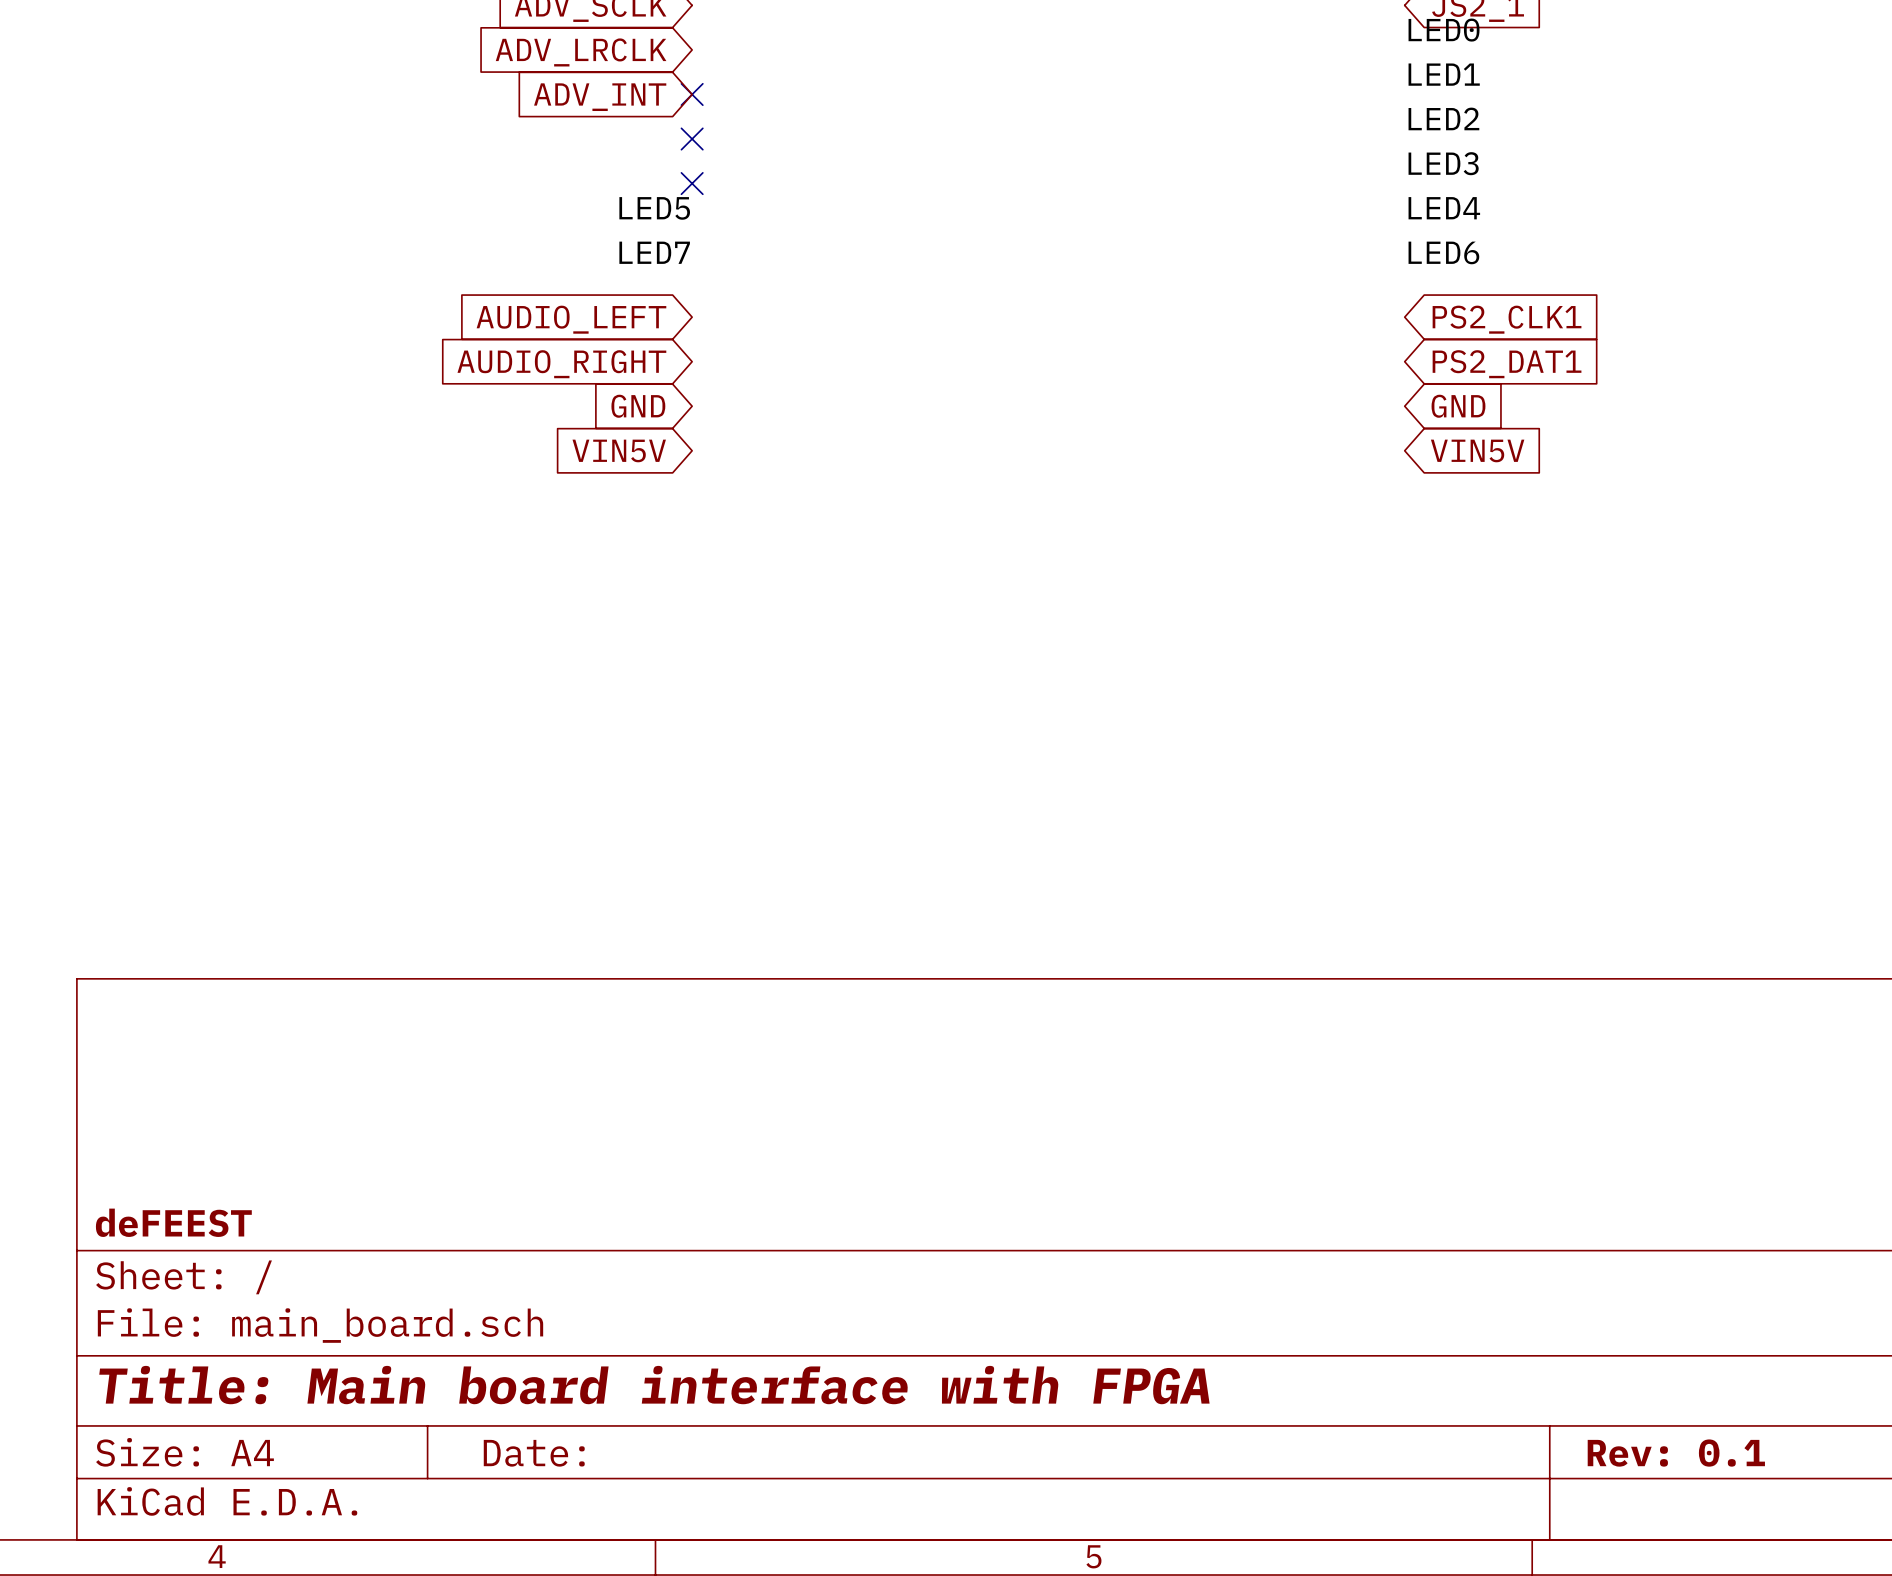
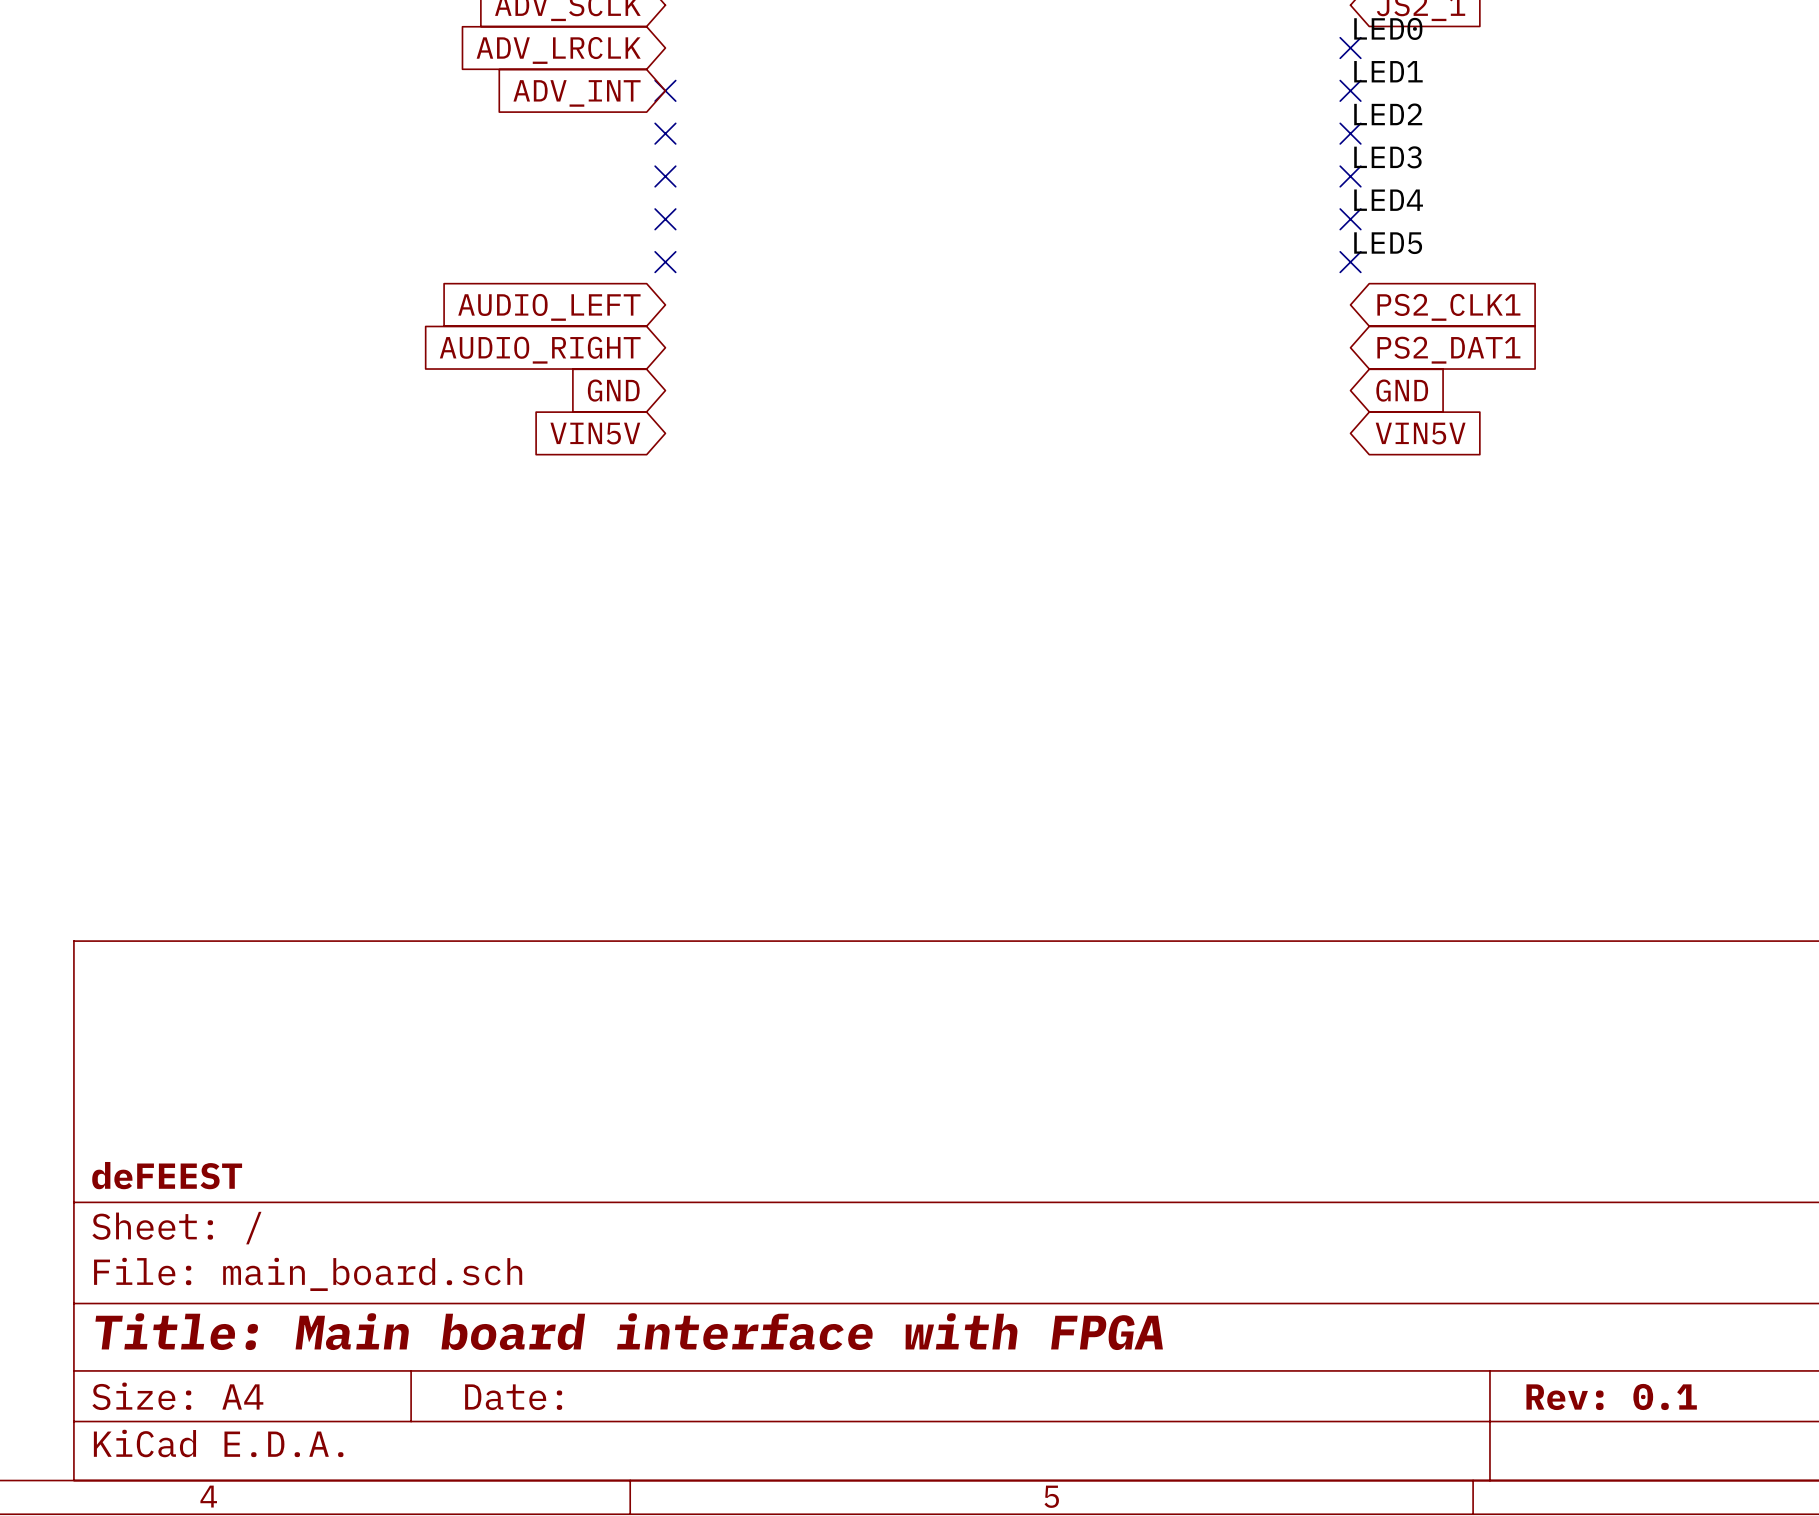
no-connect mark: none -> (1350, 48)
no-connect mark: none -> (1350, 90)
no-connect mark: none -> (1350, 133)
no-connect mark: none -> (1350, 176)
label: LED5 (654, 208) -> none
no-connect mark: none -> (665, 219)
no-connect mark: none -> (1350, 219)
label: LED7 (654, 252) -> none
label: LED6 (1443, 252) -> LED5 (1388, 243)
no-connect mark: none -> (665, 262)
no-connect mark: none -> (1350, 262)

